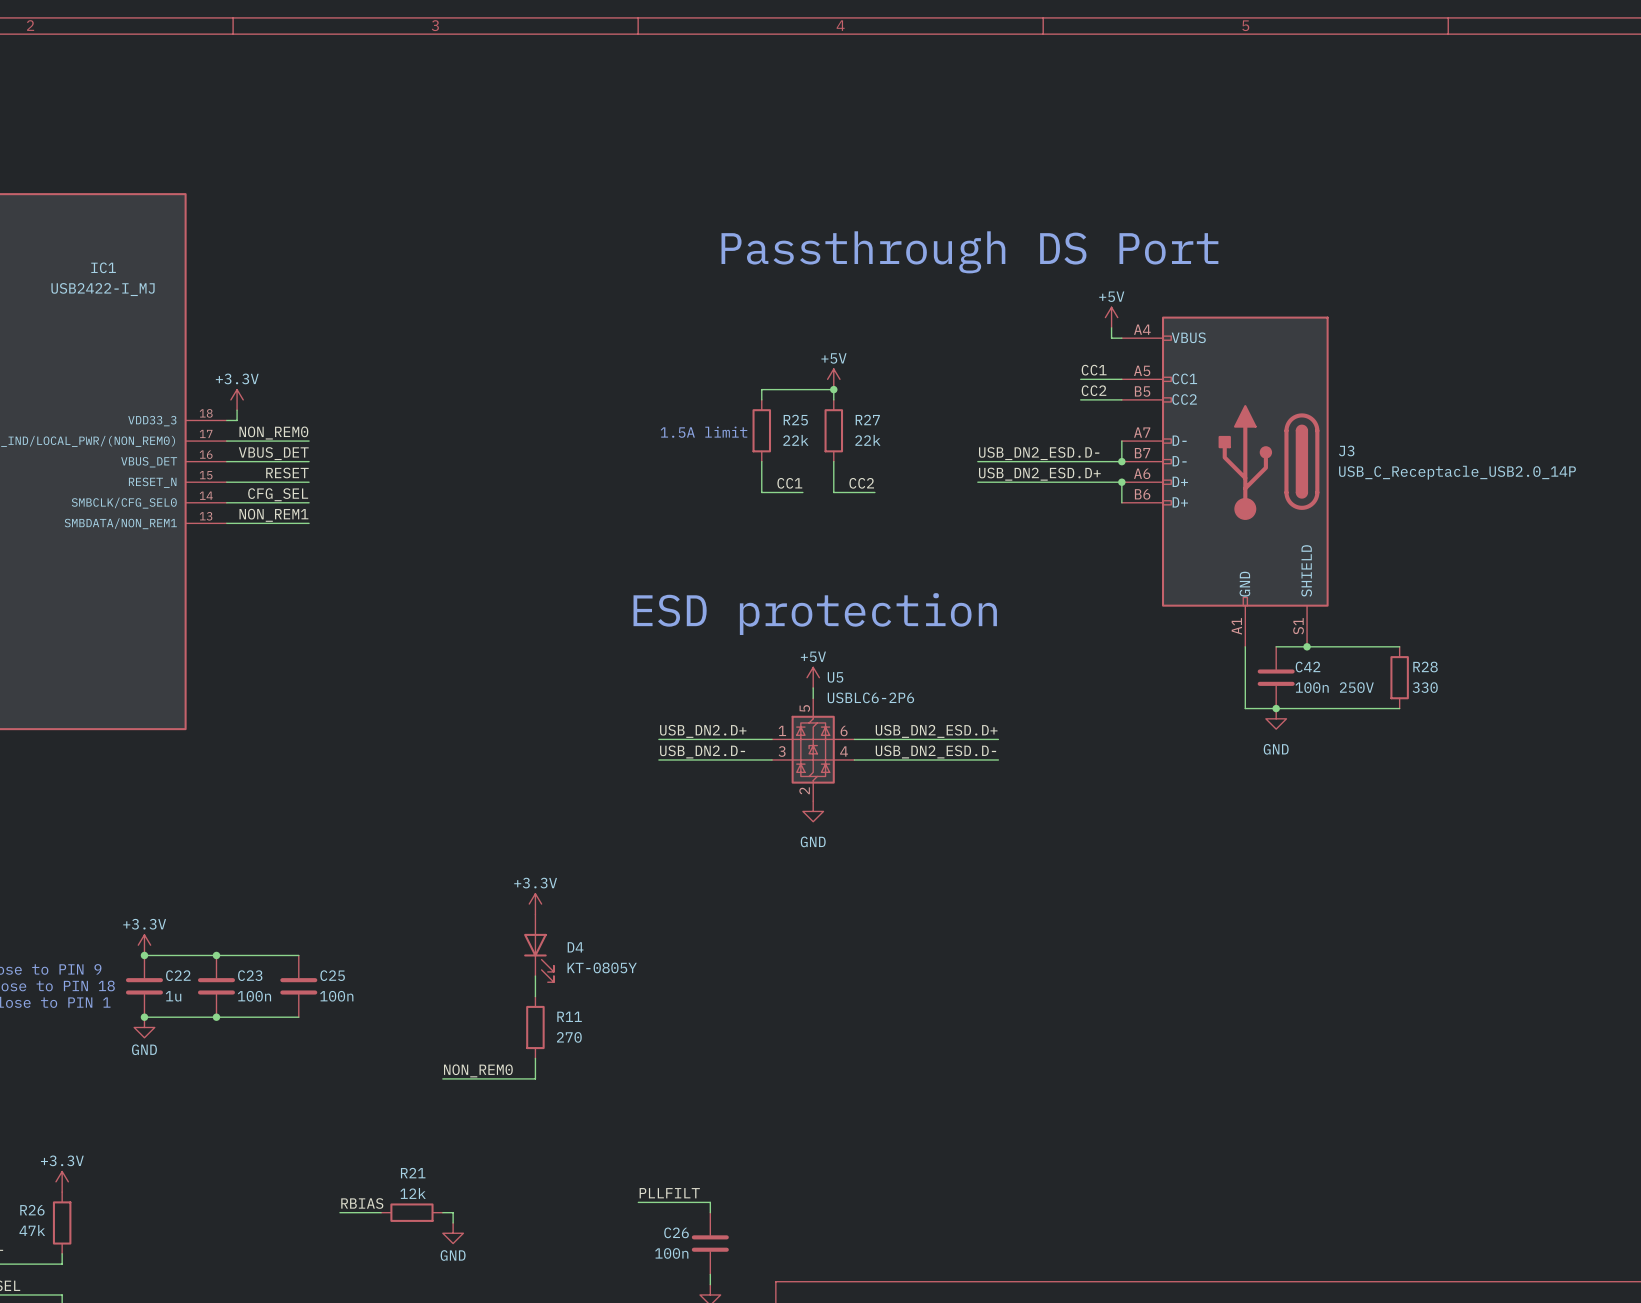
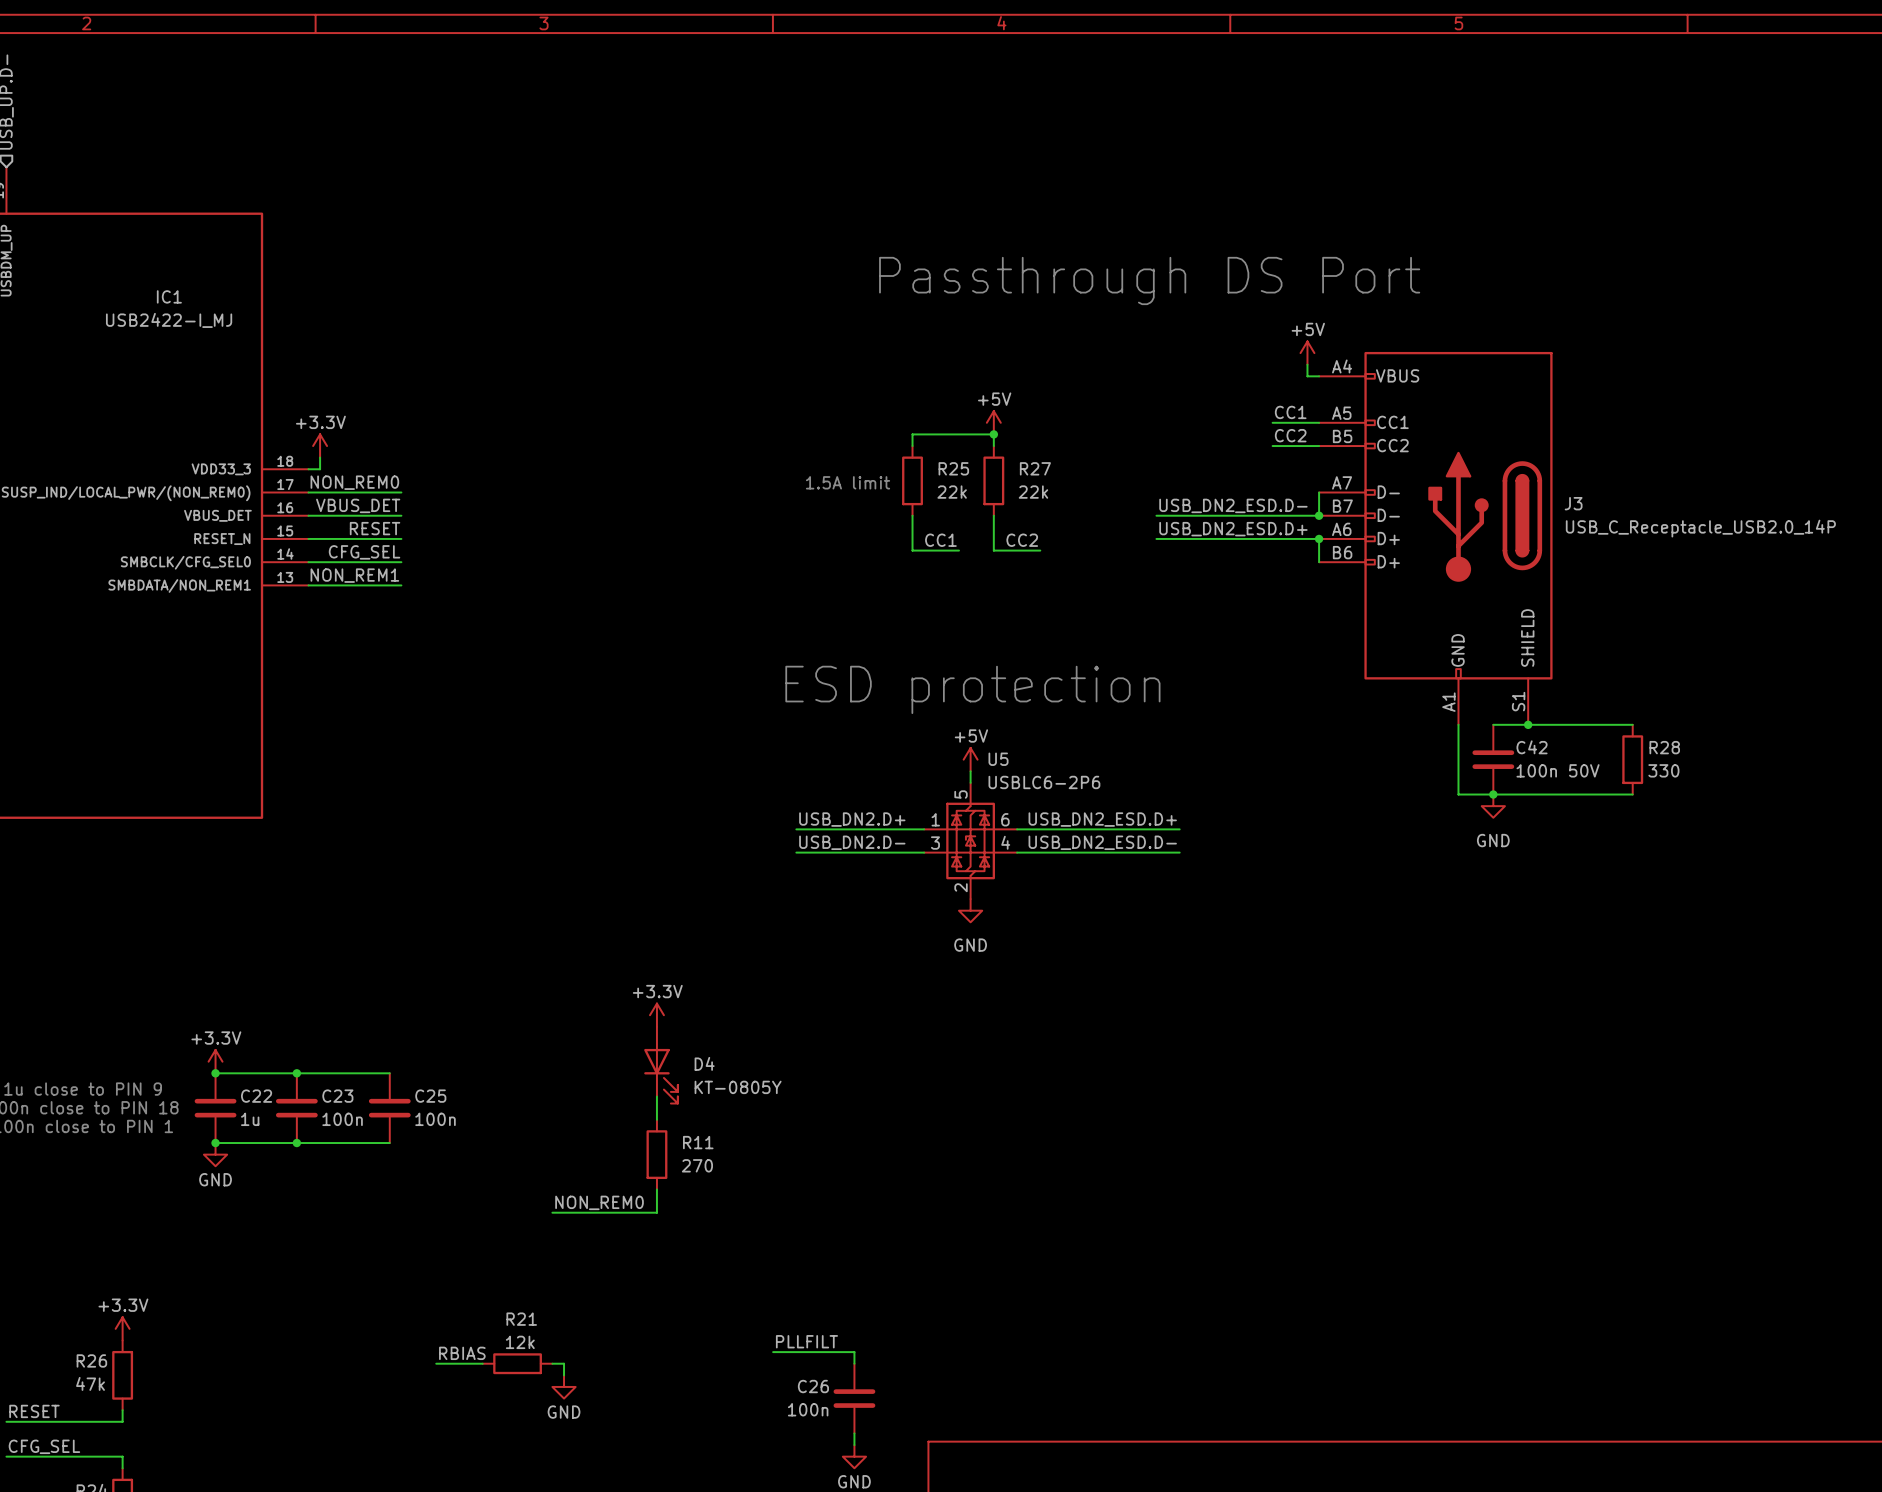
C42 value: 100n 250V (1334, 687) -> 100n 50V (1558, 770)

